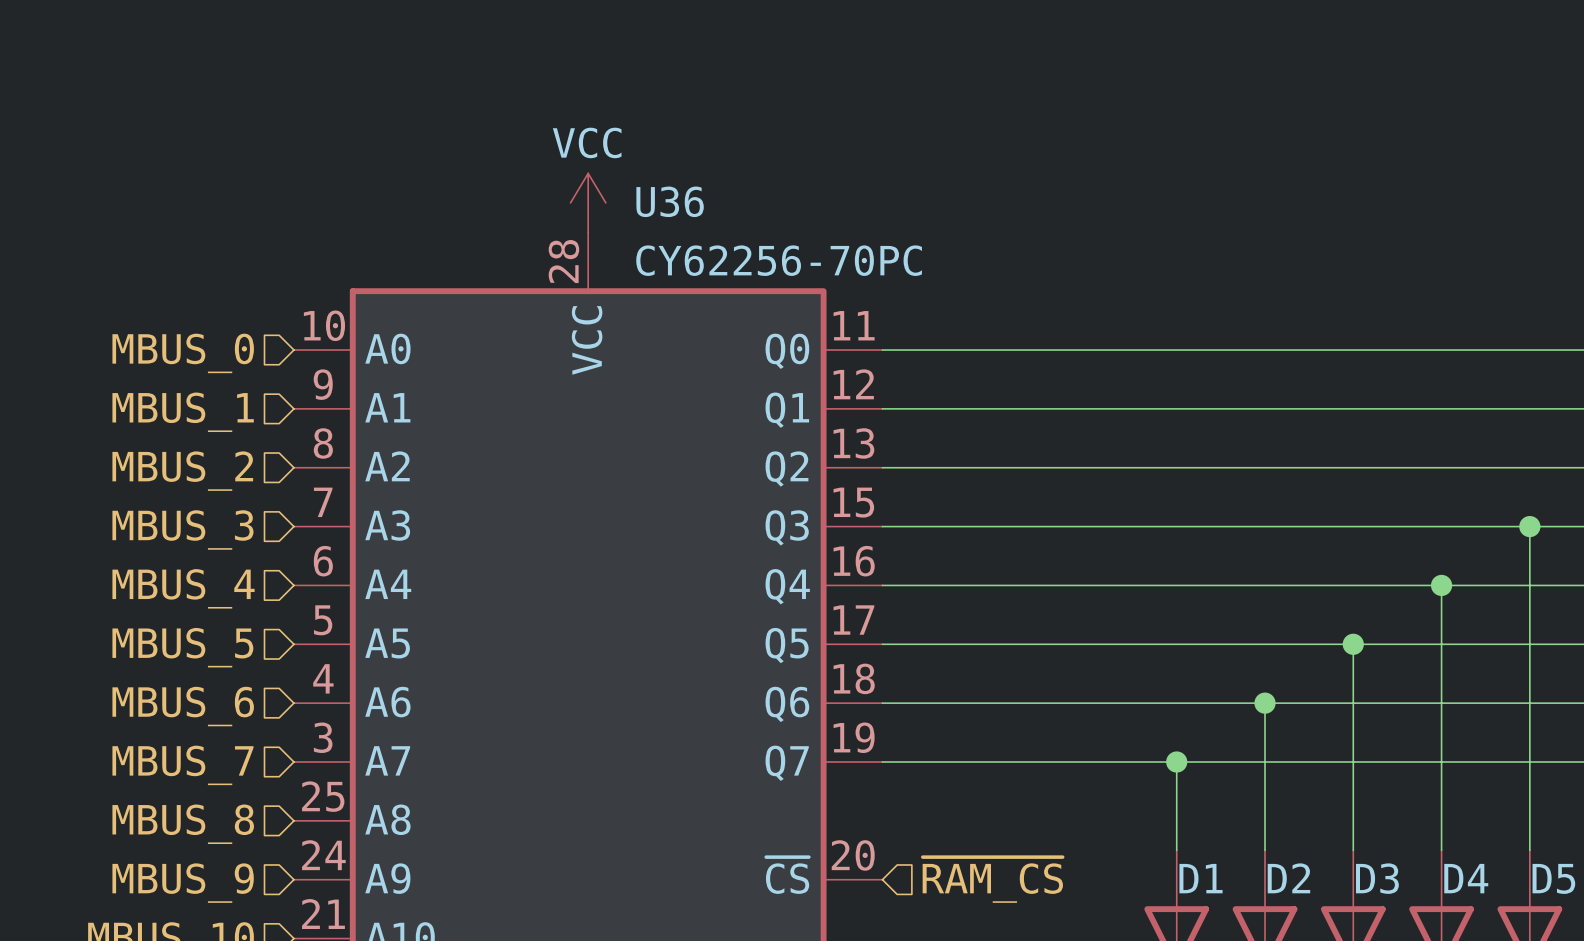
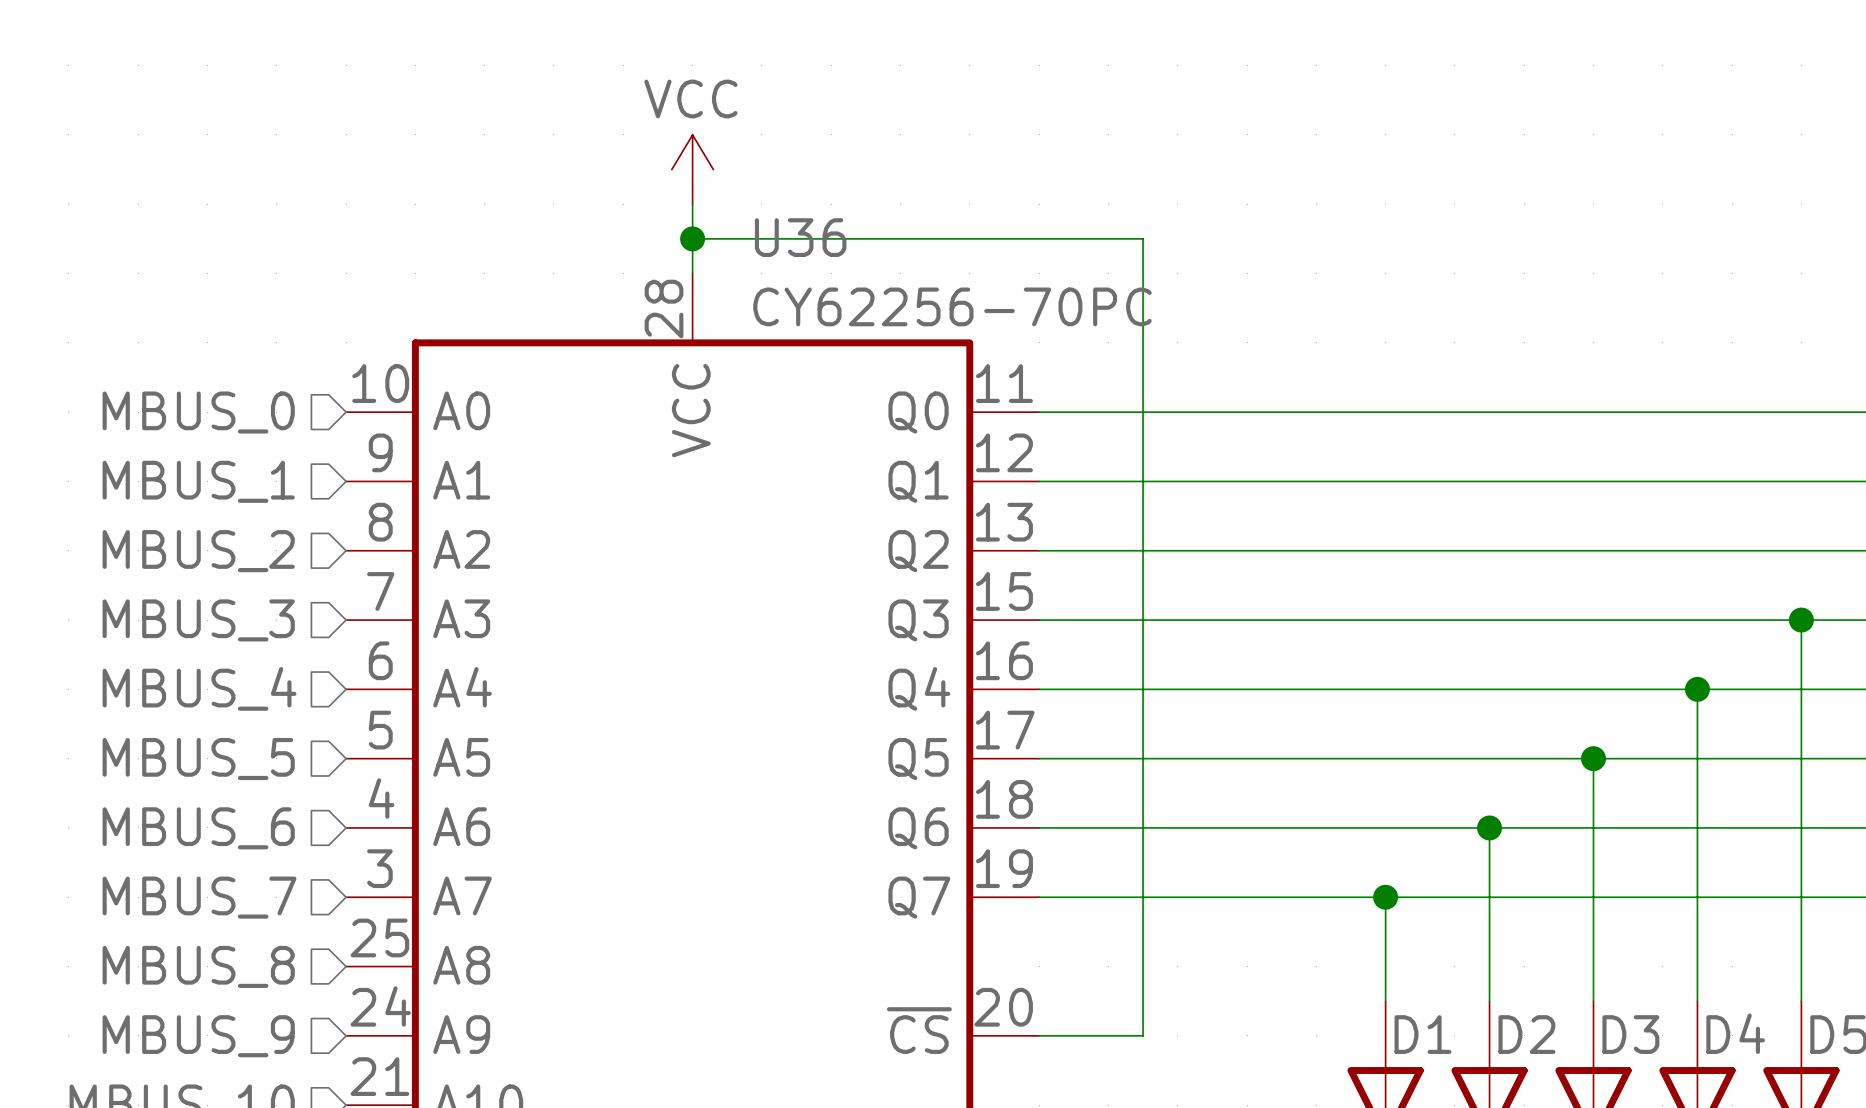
wire: none -> (692, 238) (1143, 238) (1143, 1035) (1039, 1035)
power symbol position: VCC (588, 202) -> VCC (692, 169)
junction: none -> (692, 238)
hierarchical label: ~{RAM_CS} (992, 879) -> none

